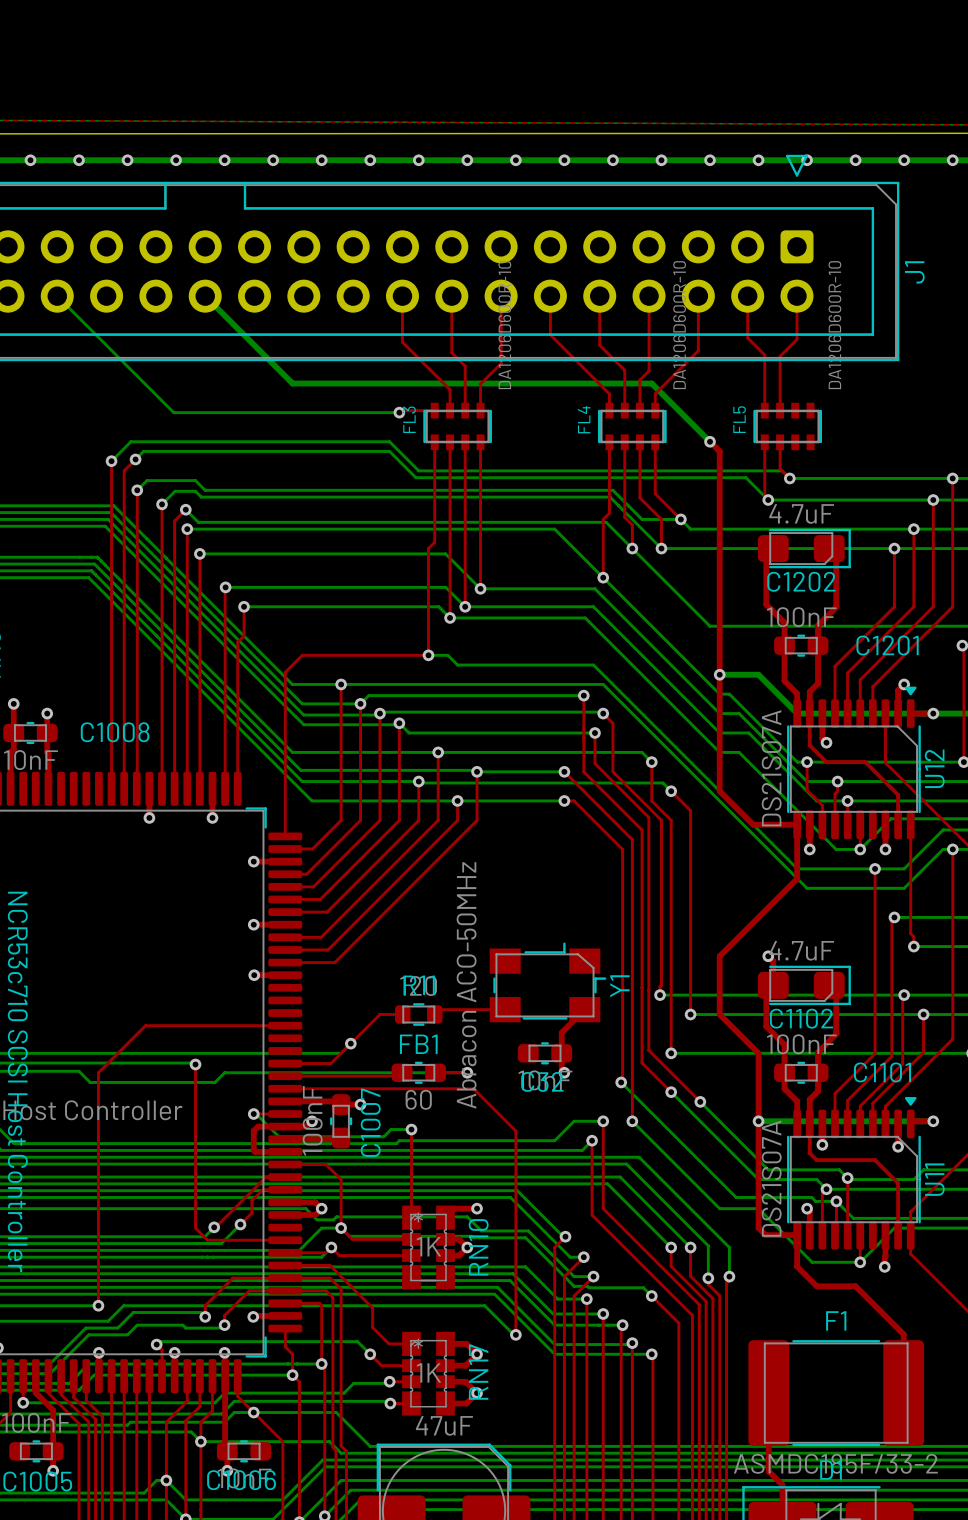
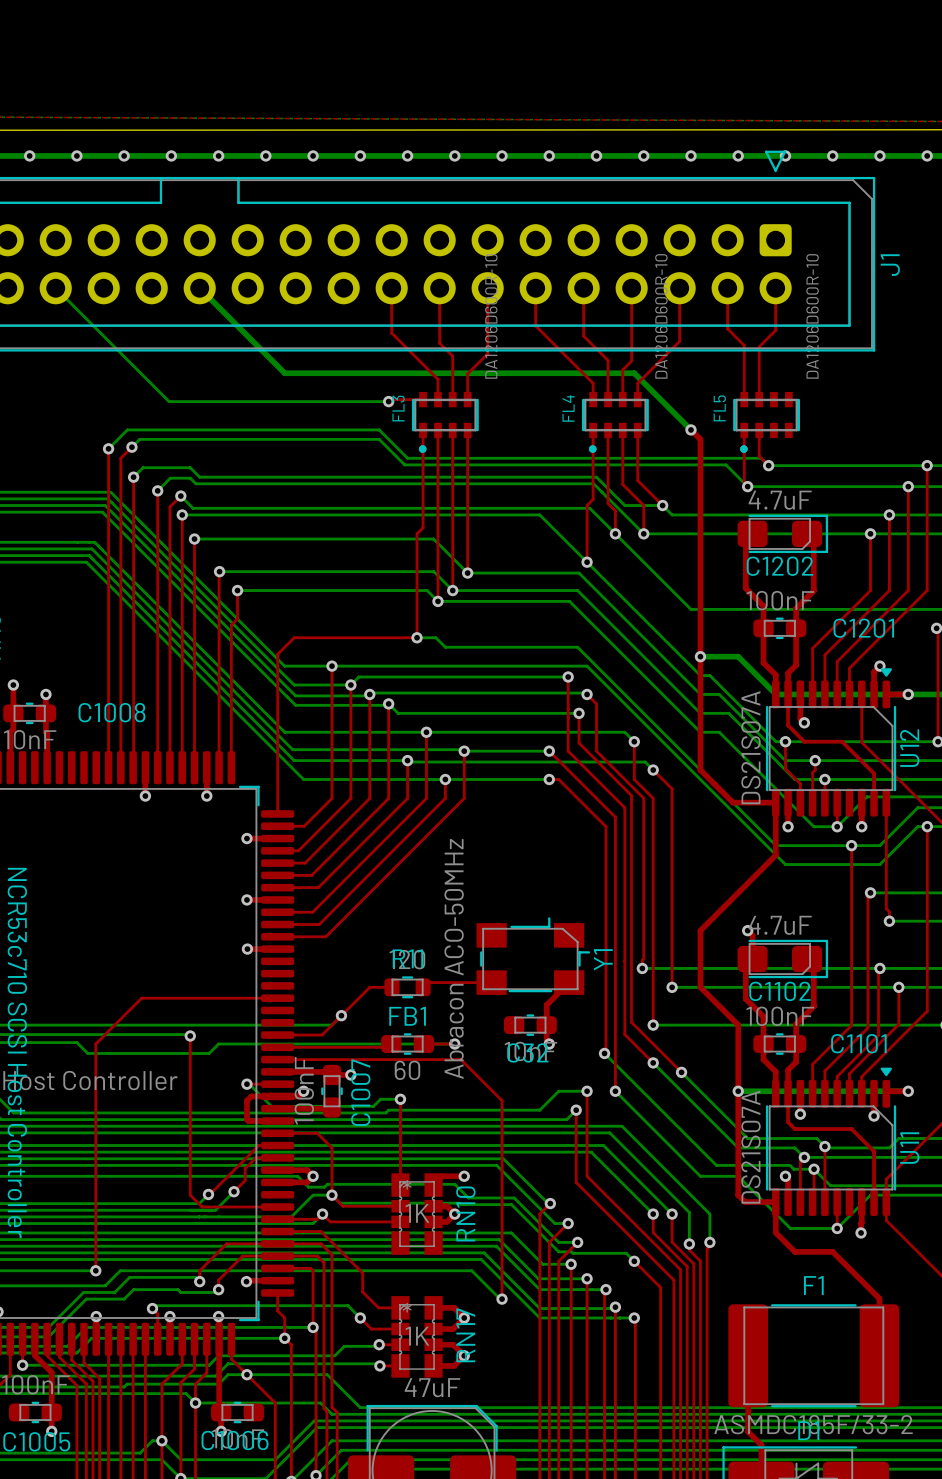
FL3 footprint: [423, 402, 492, 451] -> [411, 392, 479, 453]
FL4 footprint: [598, 402, 667, 451] -> [582, 392, 649, 453]
FL5 footprint: [753, 402, 823, 451] -> [733, 392, 800, 453]

